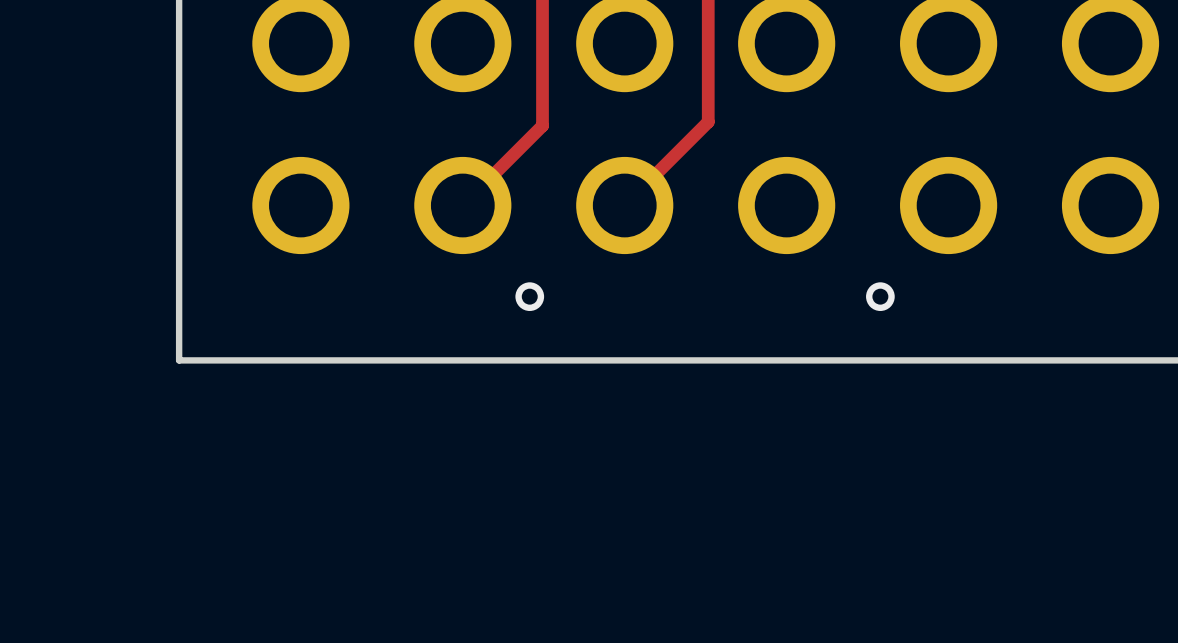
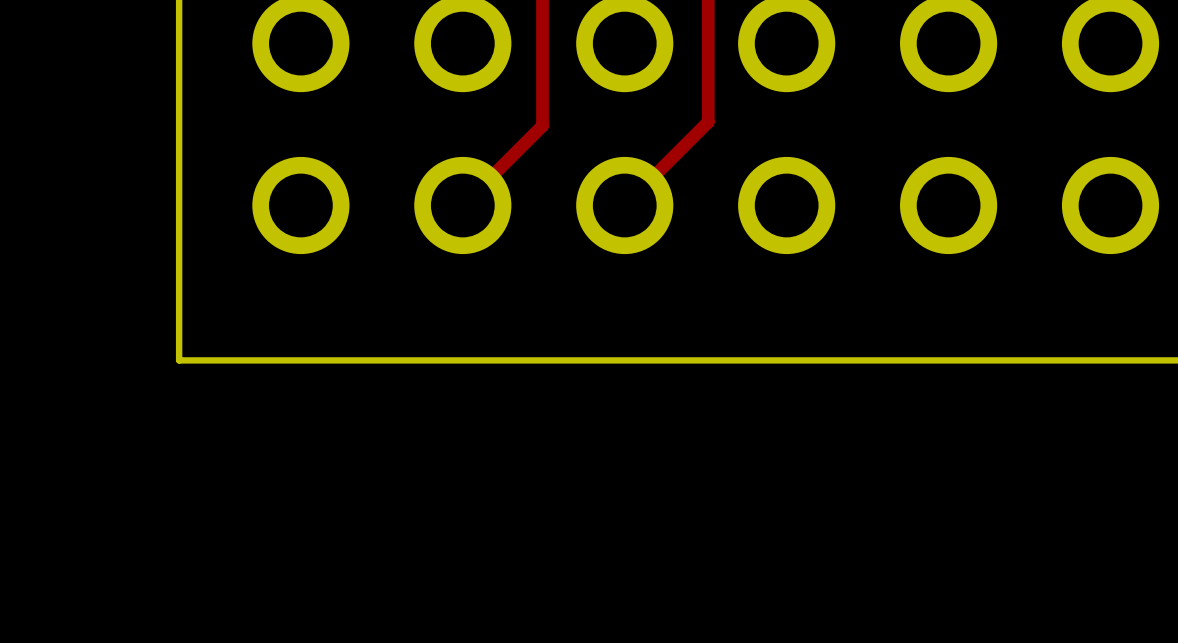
via: (529, 296) -> none
via: (880, 296) -> none

